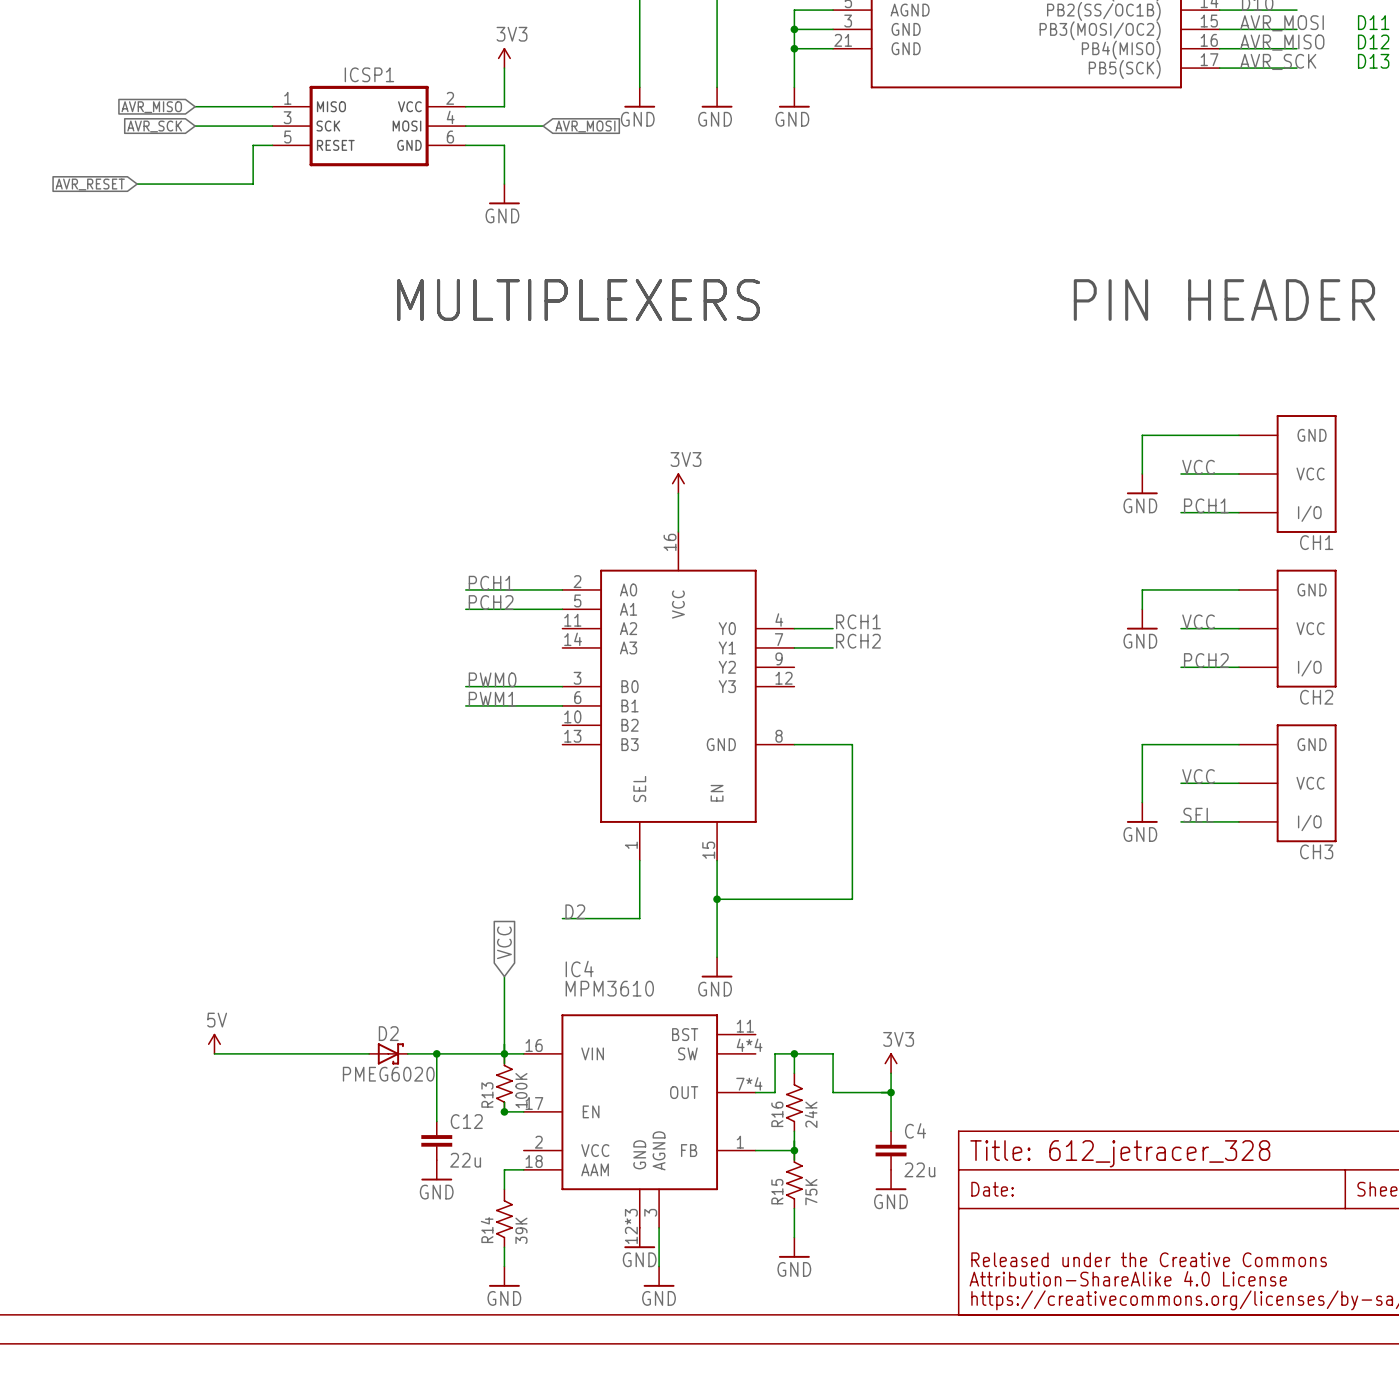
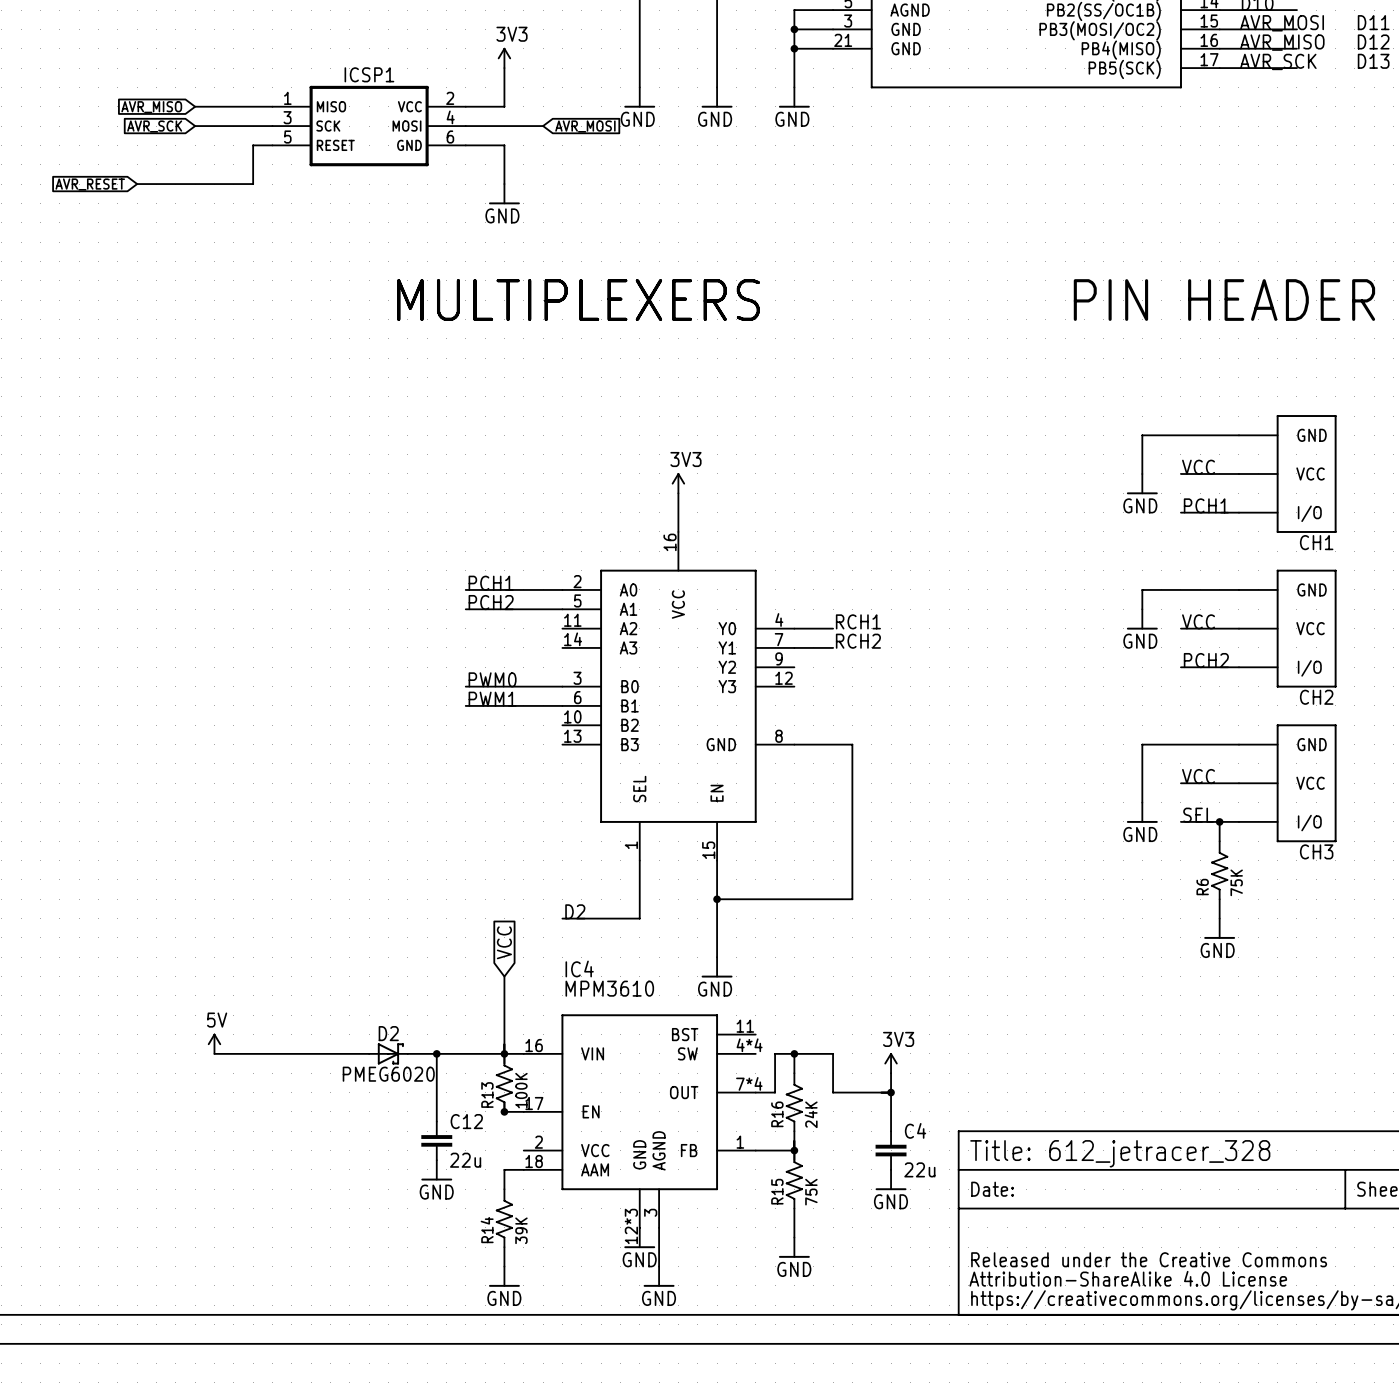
wire: none -> (1219, 821) (1219, 841)
junction: none -> (1219, 821)
R6: none -> 75K (1219, 870)
wire: none -> (1219, 899) (1219, 918)
power symbol: none -> GND (1219, 928)

